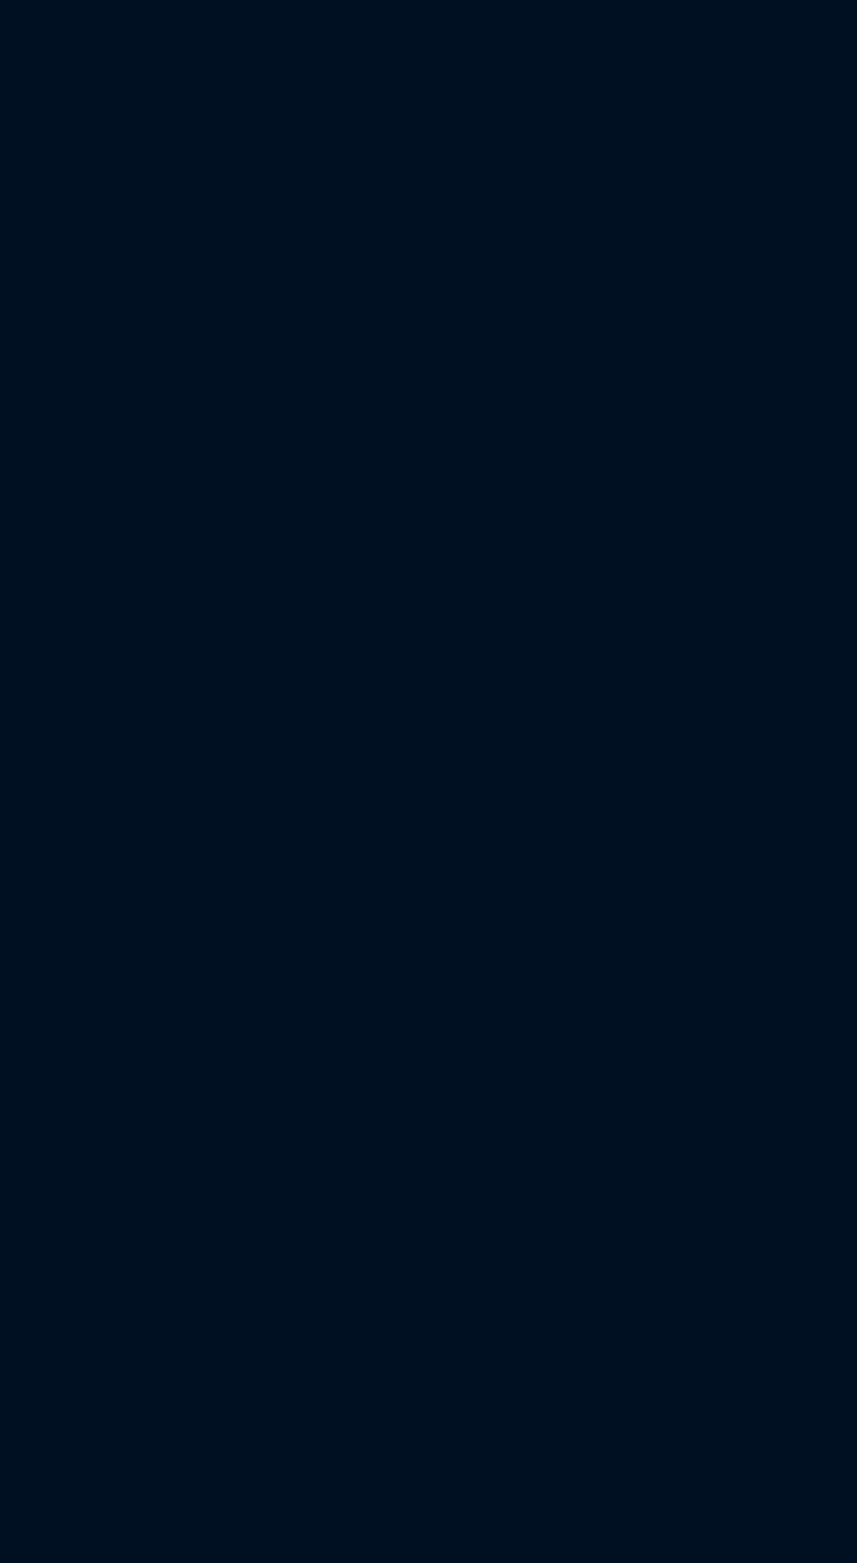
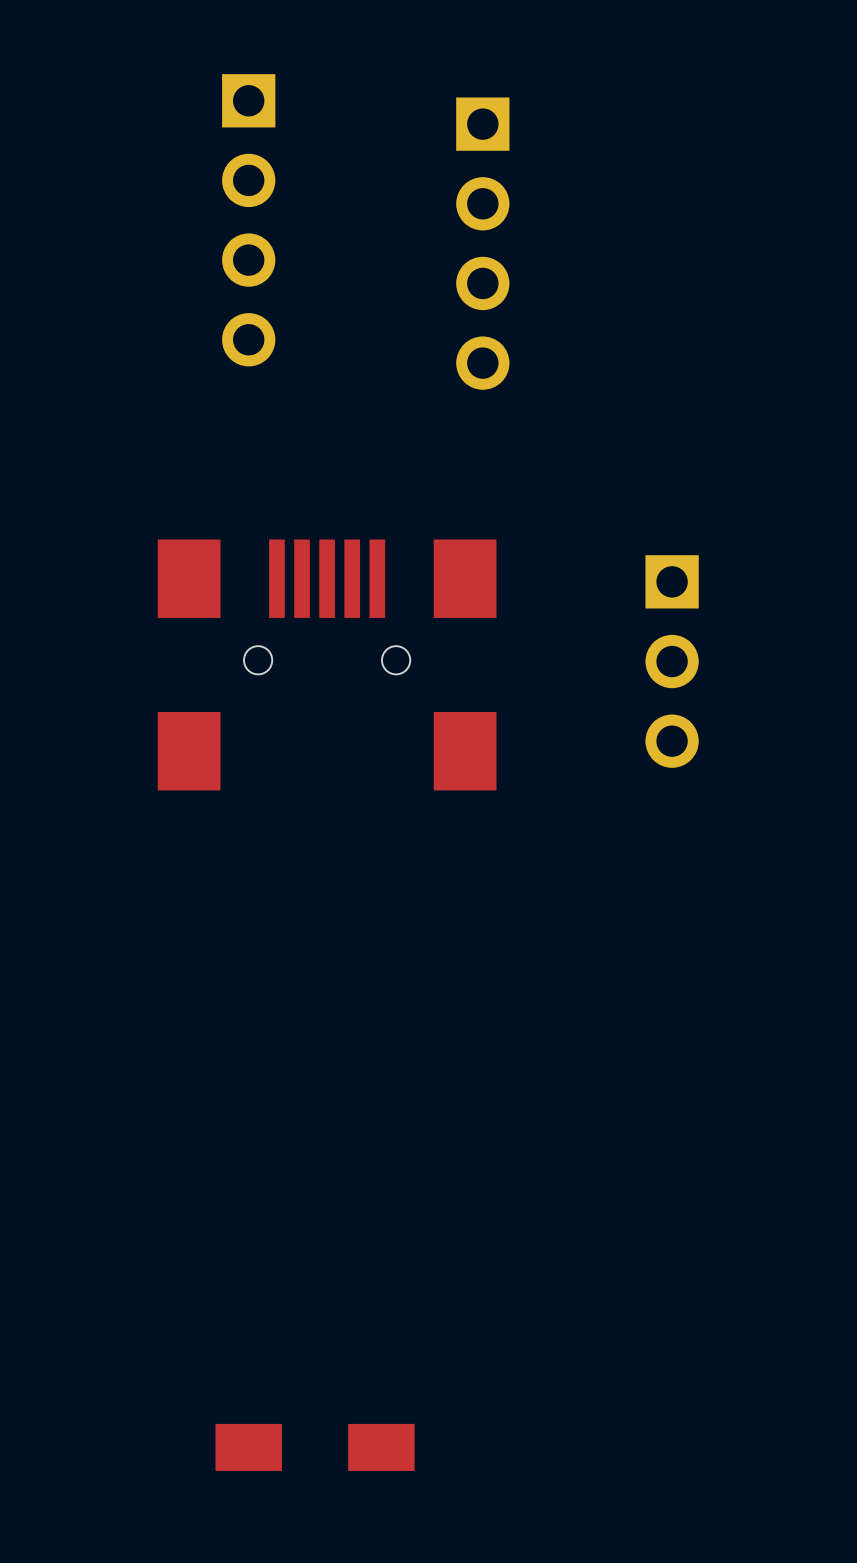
part: none -> (248, 220)
part: none -> (482, 243)
part: none -> (672, 661)
part: none -> (327, 664)
part: none -> (315, 1447)

